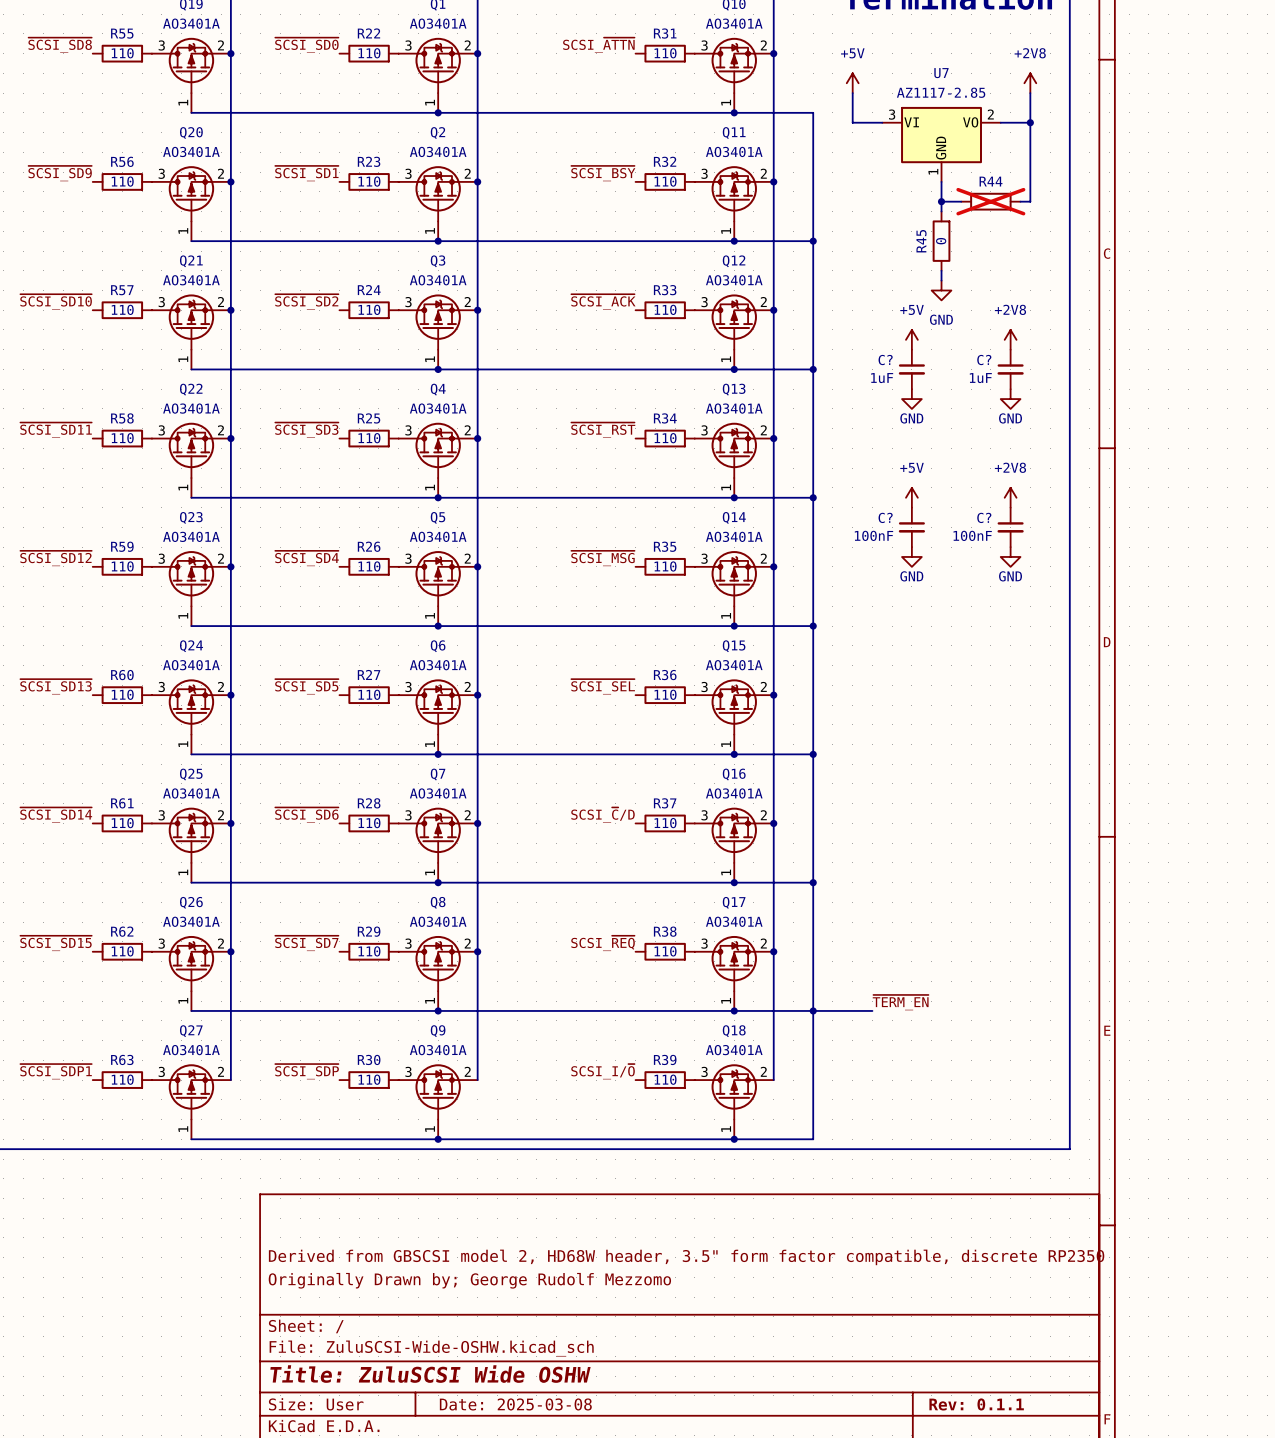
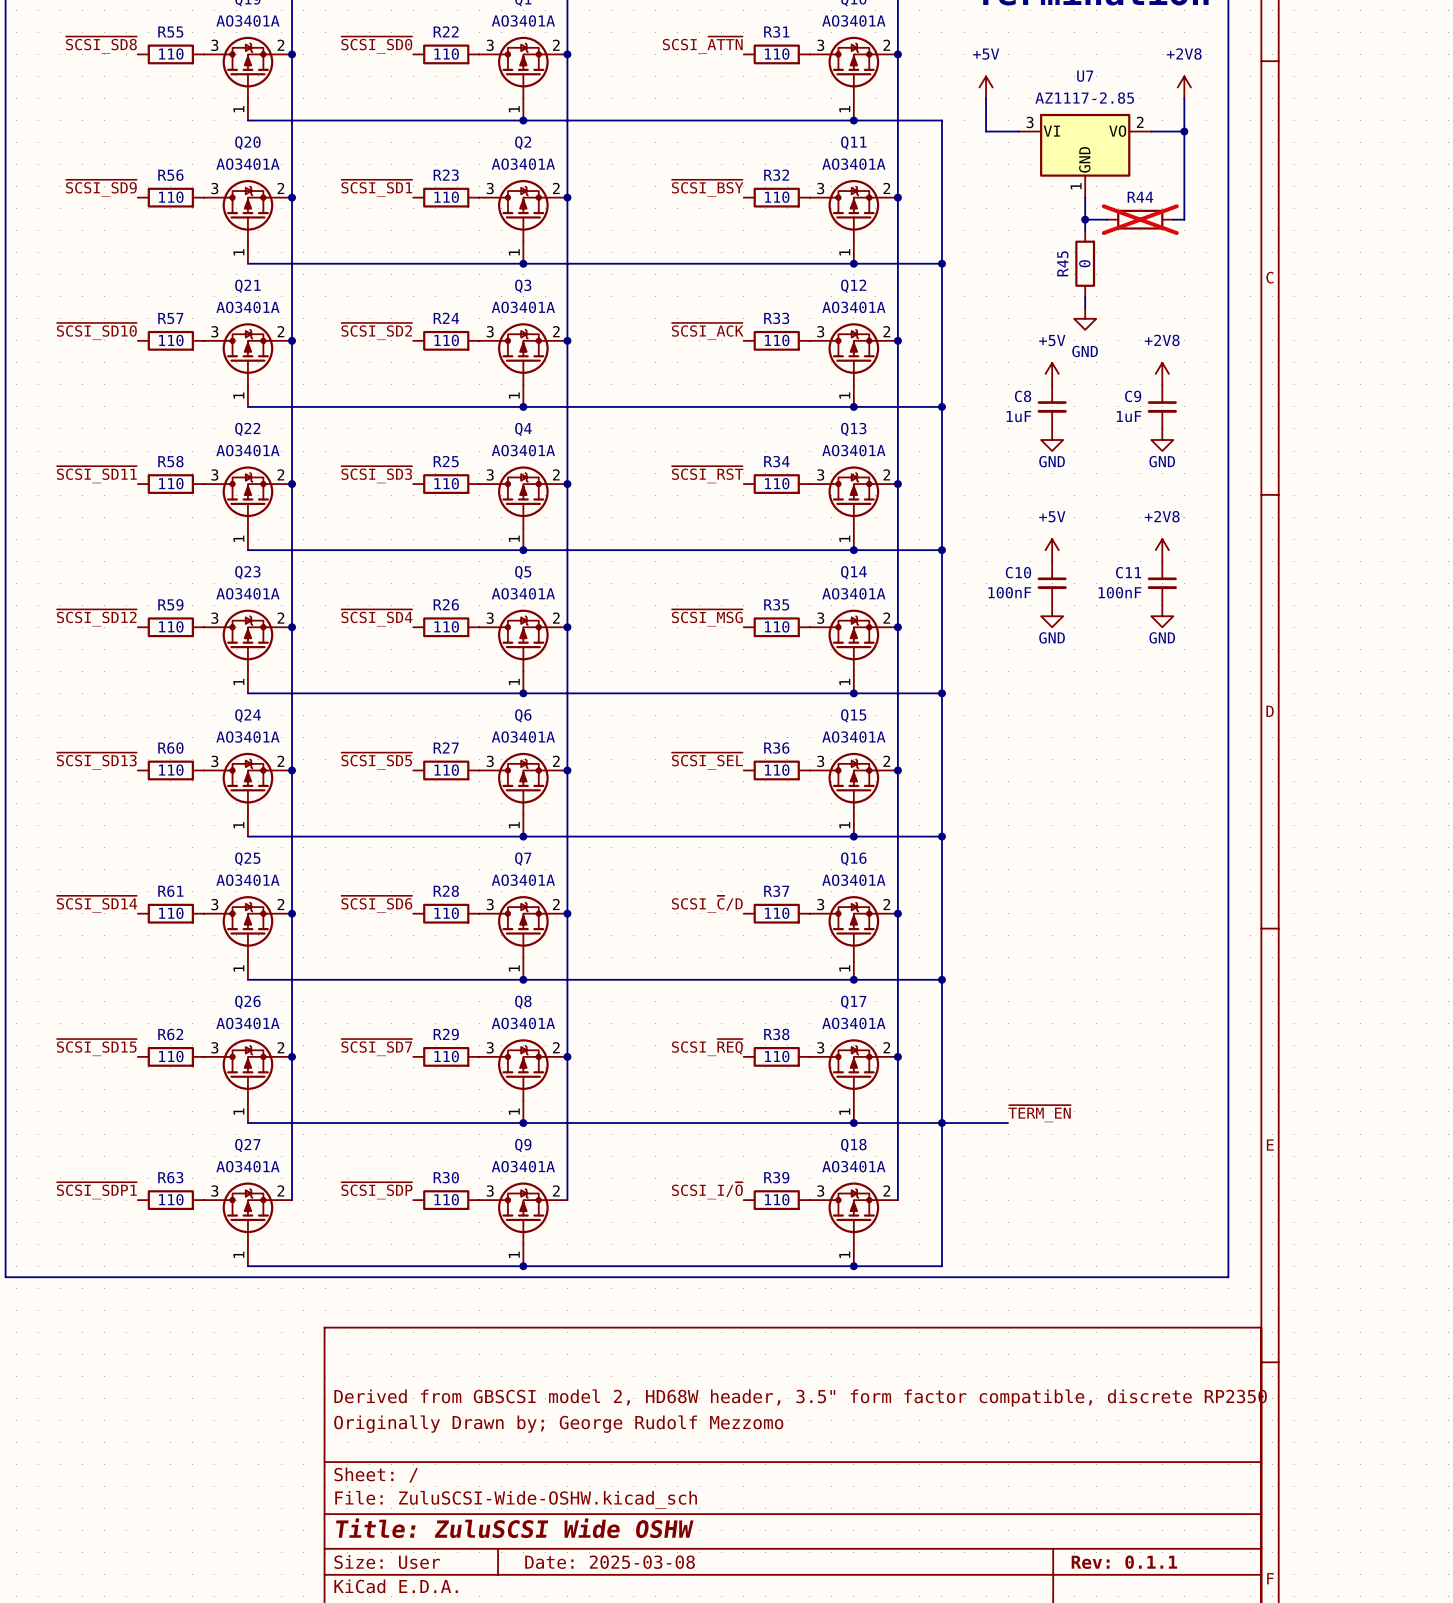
C? name: C? (885, 360) -> C8 (1023, 396)
C? name: C? (984, 360) -> C9 (1133, 396)
C? name: C? (885, 517) -> C10 (1018, 572)
C? name: C? (984, 517) -> C11 (1128, 572)

